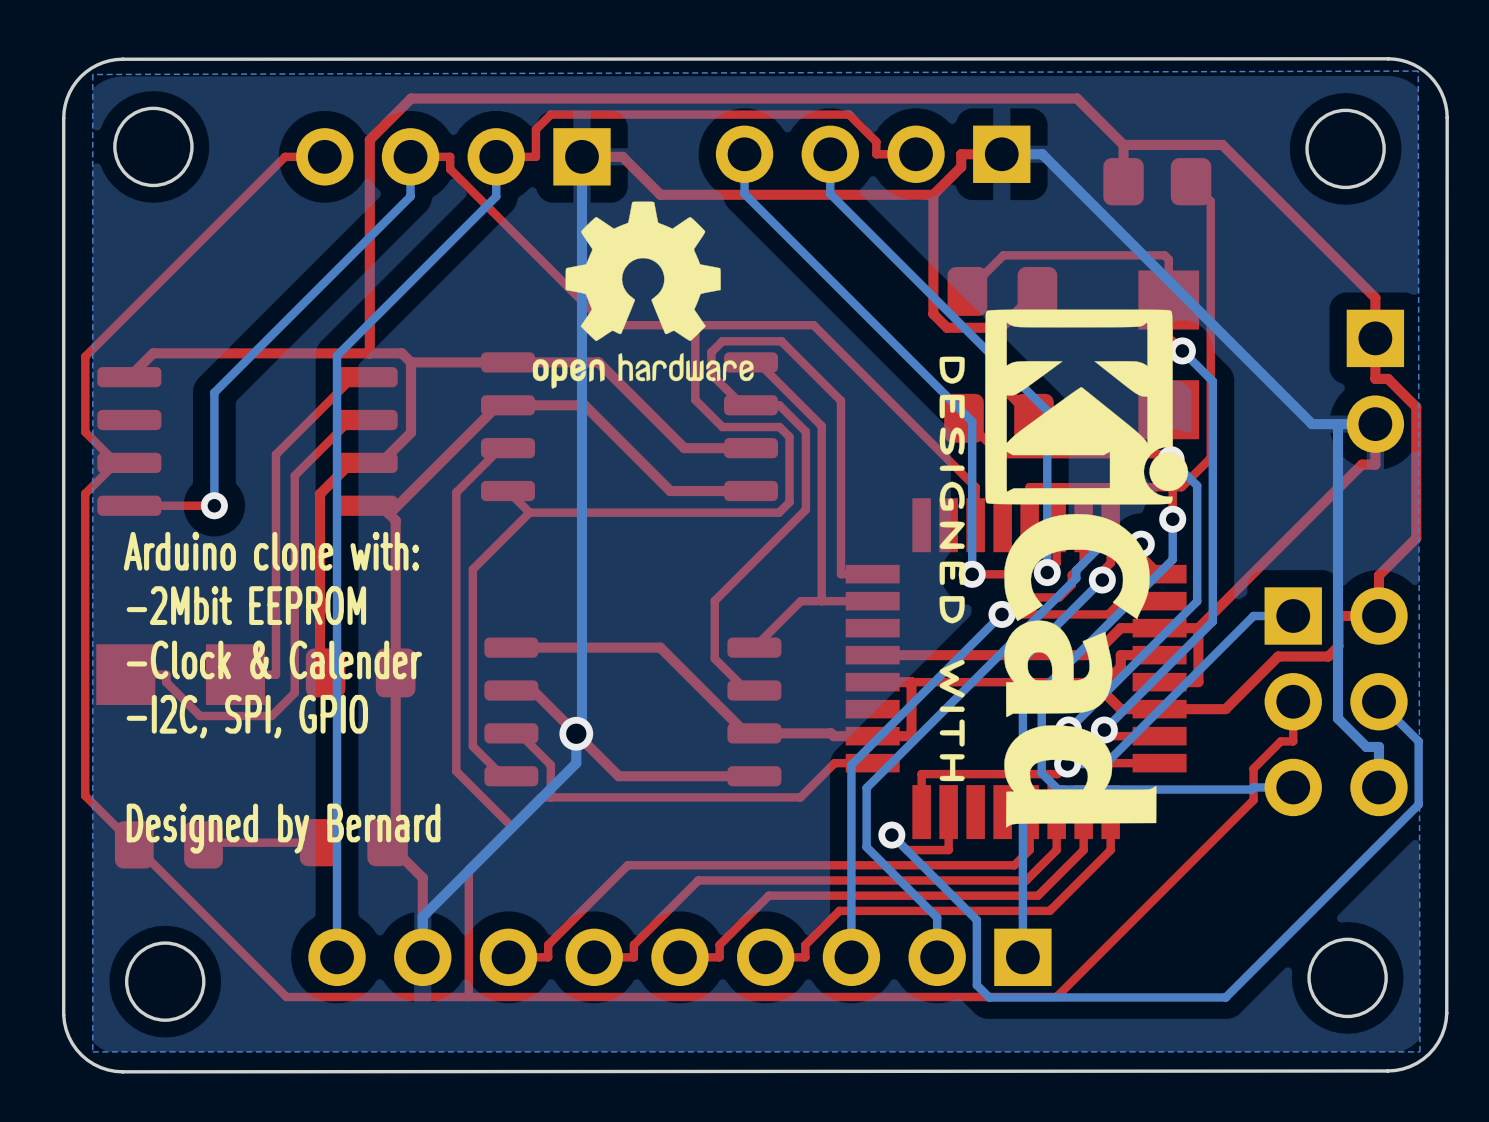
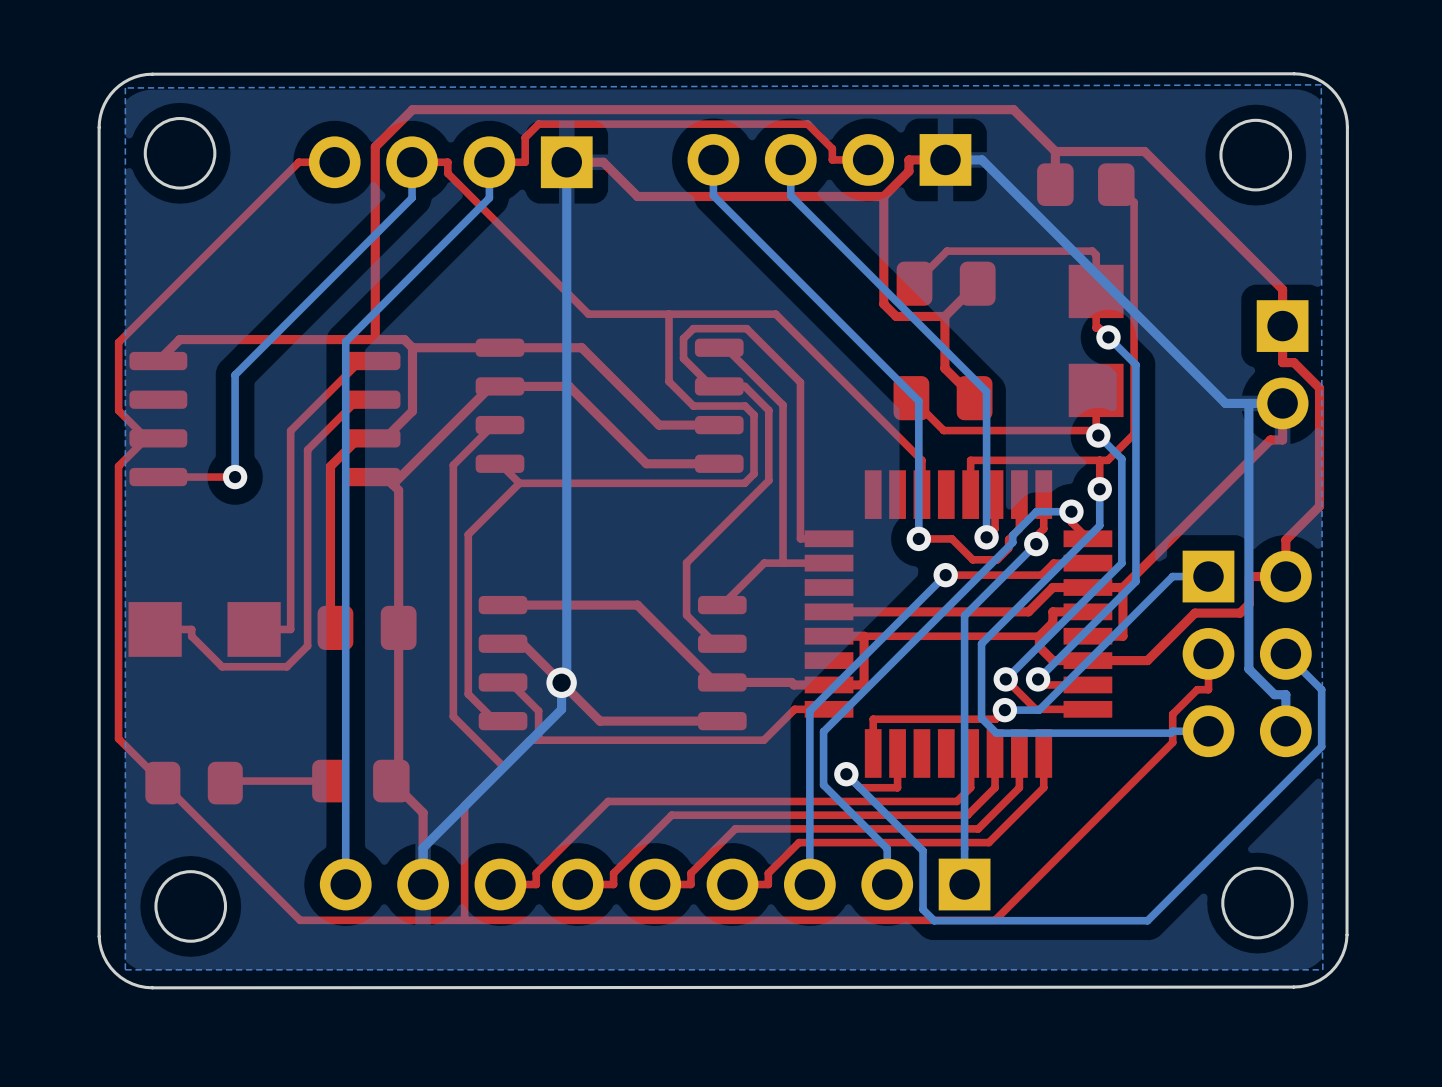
drawing: [532, 201, 754, 389] -> none
drawing: [939, 309, 1189, 828] -> none
text: Arduino clone with: (271, 551) -> none
text: -2Mbit EEPROM (246, 605) -> none
text: -Clock & Calender (274, 659) -> none
text: -I2C, SPI, GPIO (247, 716) -> none
text: Designed by Bernard (283, 828) -> none

